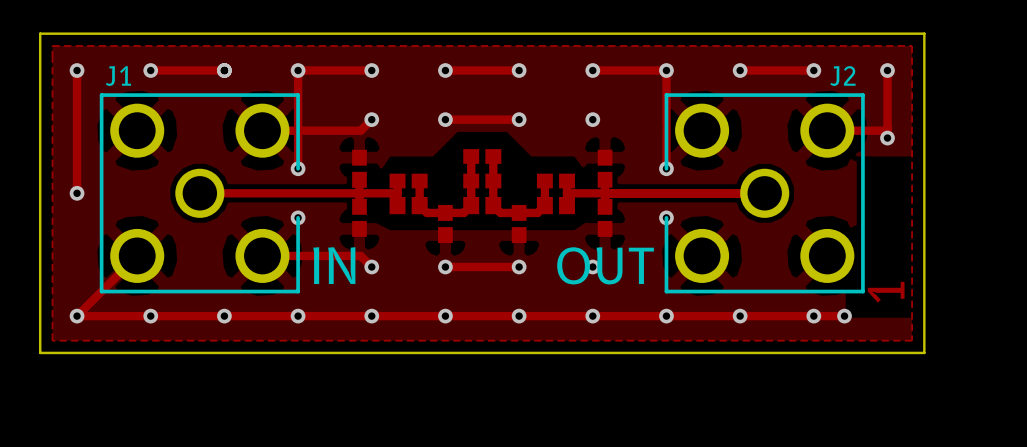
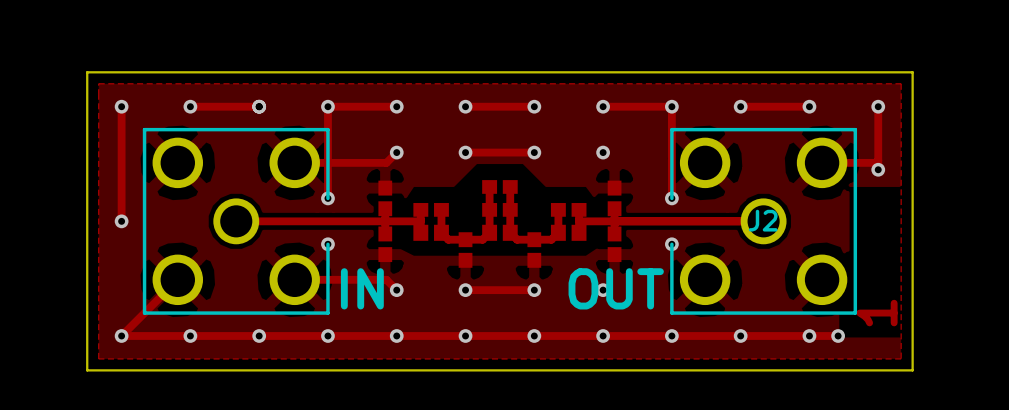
J1 name: J1 (118, 76) -> none
J2 name position: J2 (842, 76) -> J2 (763, 220)

